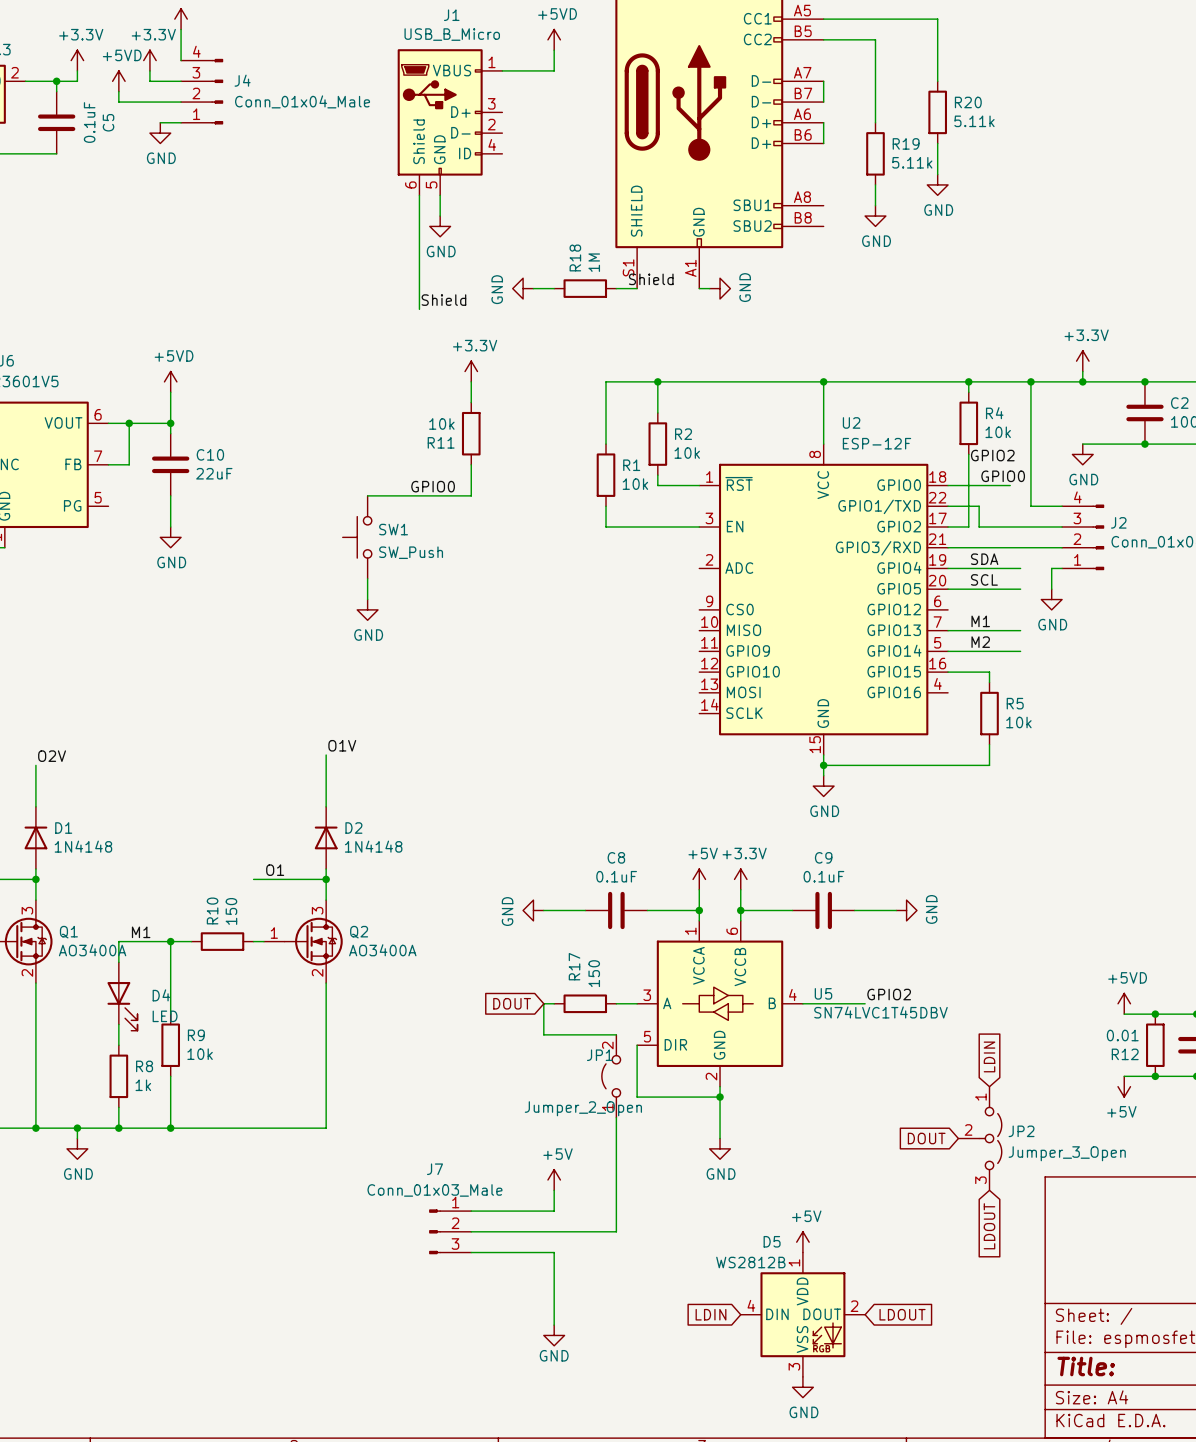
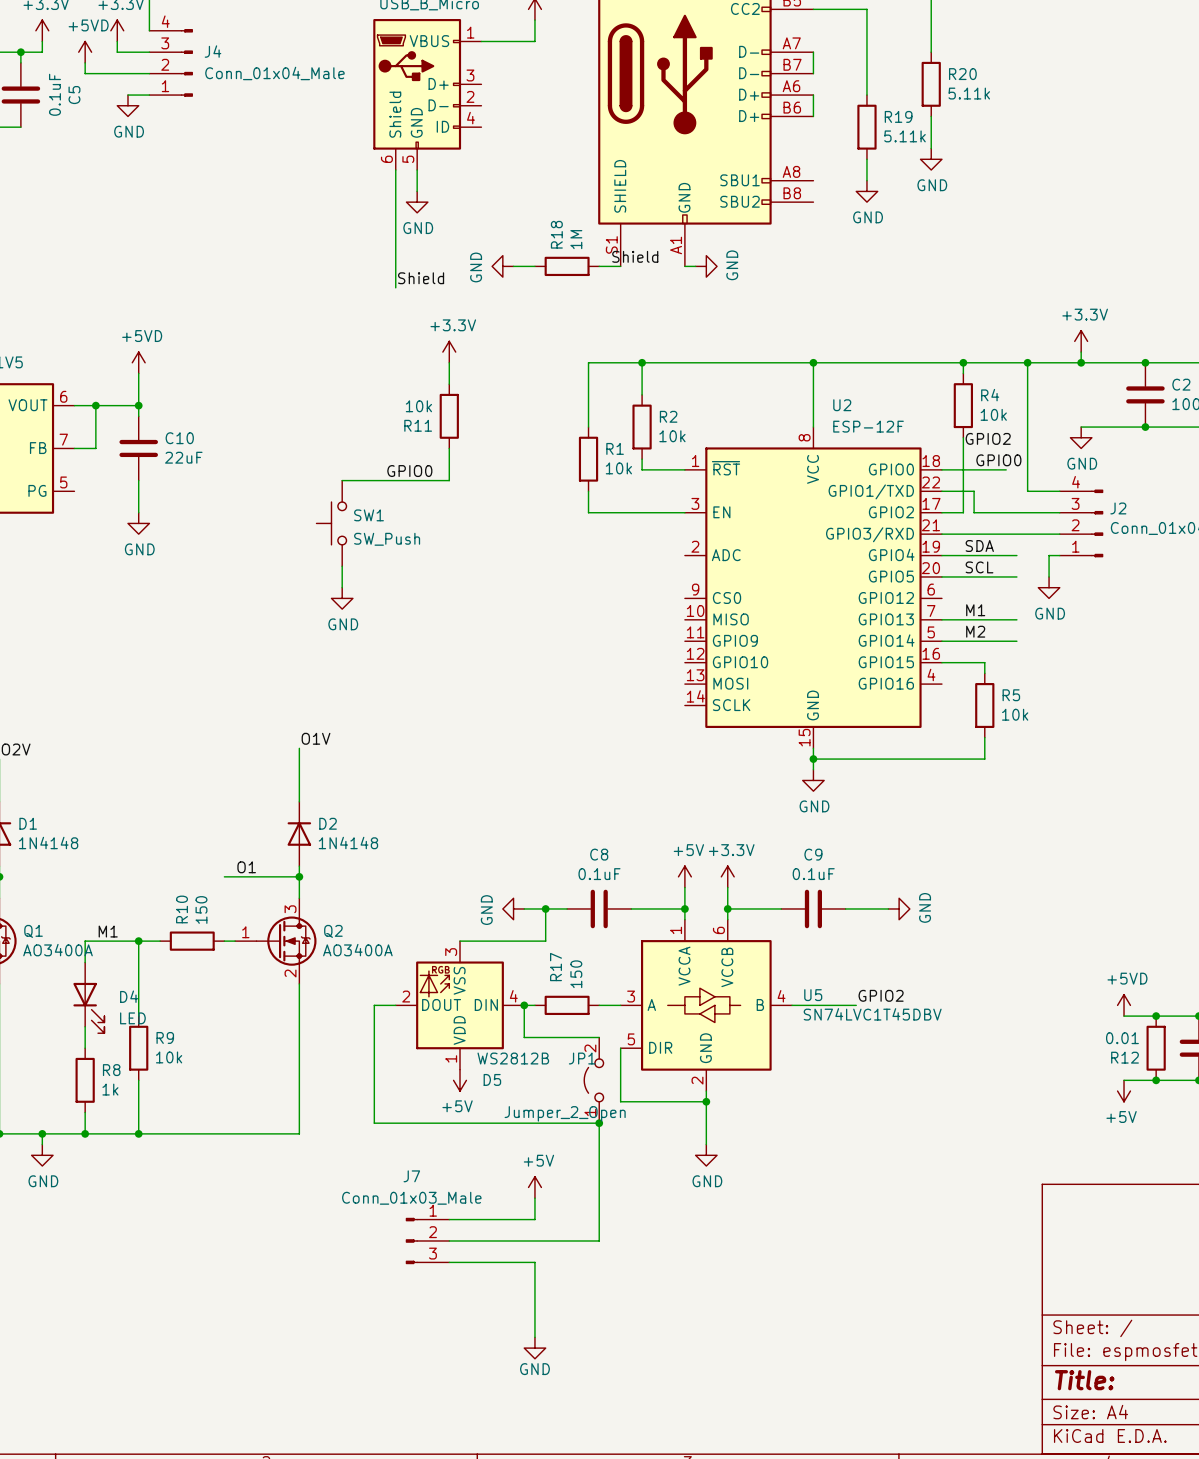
wire: none -> (545, 908) (545, 941) (460, 941)
junction: none -> (545, 908)
wire: none -> (395, 1005) (374, 1005) (374, 1123) (599, 1123)
global label: DOUT (512, 1003) -> none
junction: none -> (524, 1005)
global label: LDIN (989, 1056) -> none
power symbol: none -> +5V (460, 1080)
junction: none -> (599, 1123)
global label: DOUT (926, 1138) -> none
JP2: Jumper_3_Open (980, 1138) -> none
global label: LDOUT (989, 1226) -> none
power symbol: +5V (802, 1242) -> none
global label: LDIN (710, 1314) -> none
D5 rotation: 0° (802, 1314) -> 180° (460, 1005)
D5 position: (802, 1314) -> (460, 1005)
global label: LDOUT (902, 1314) -> none
power symbol: GND (802, 1387) -> none

